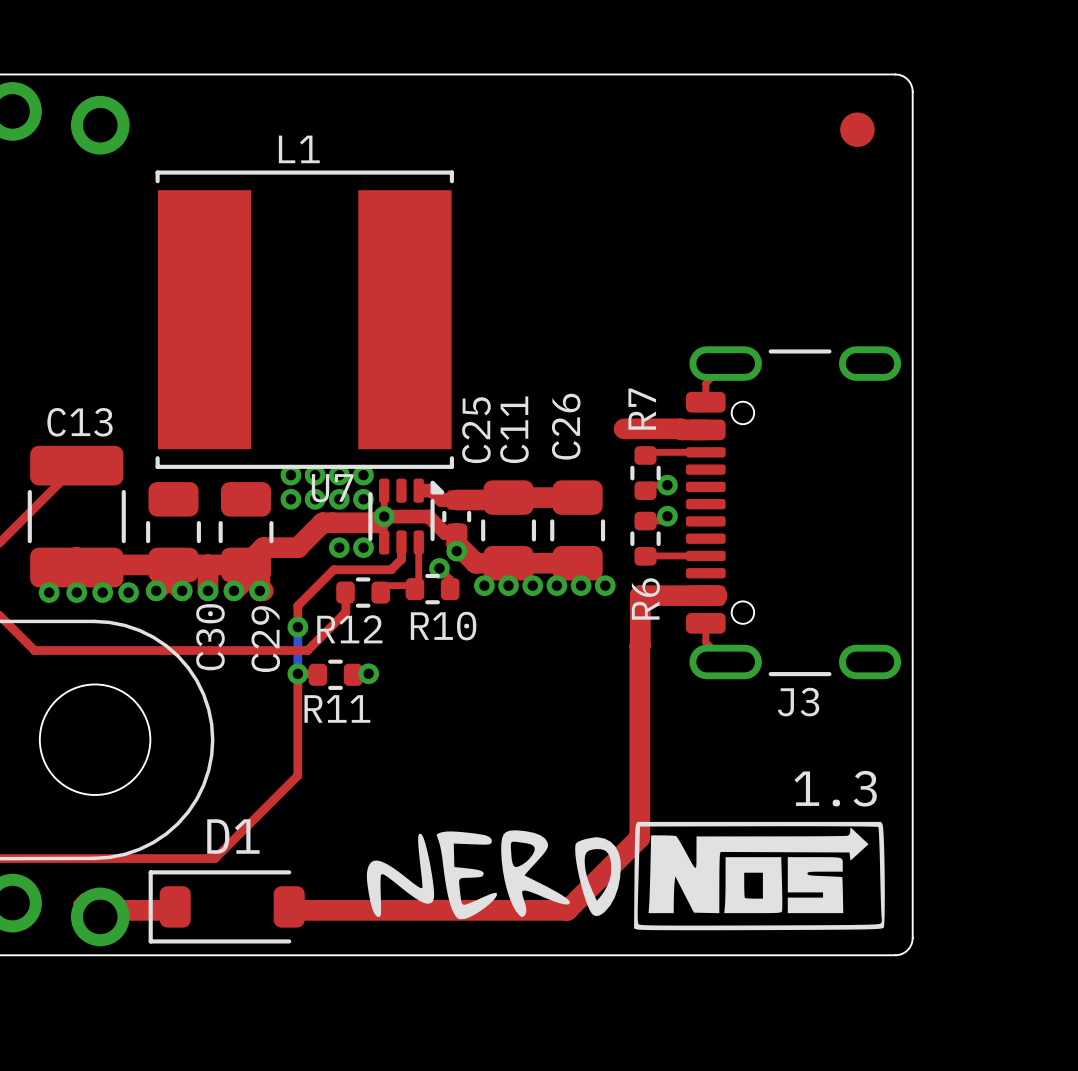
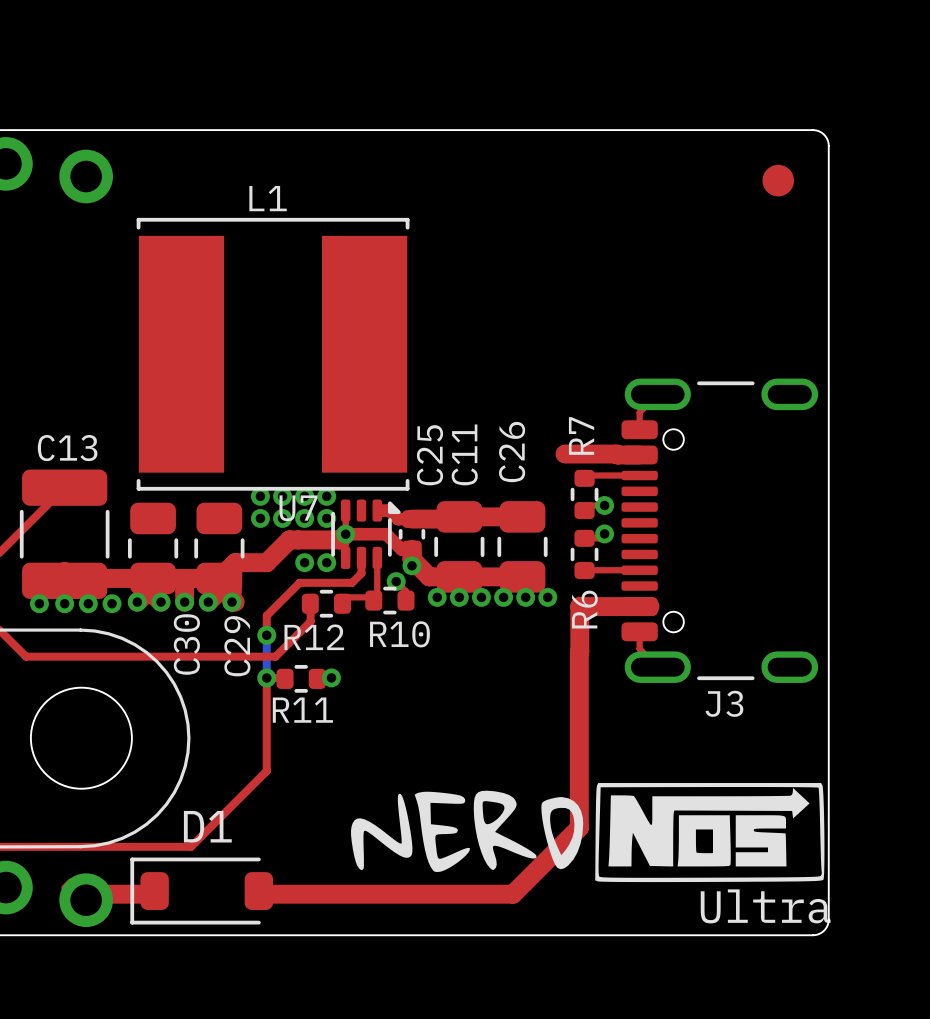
text: 1.3 (835, 788) -> none
drawing position: (625, 876) -> (587, 832)
text: none -> Ultra (765, 906)

